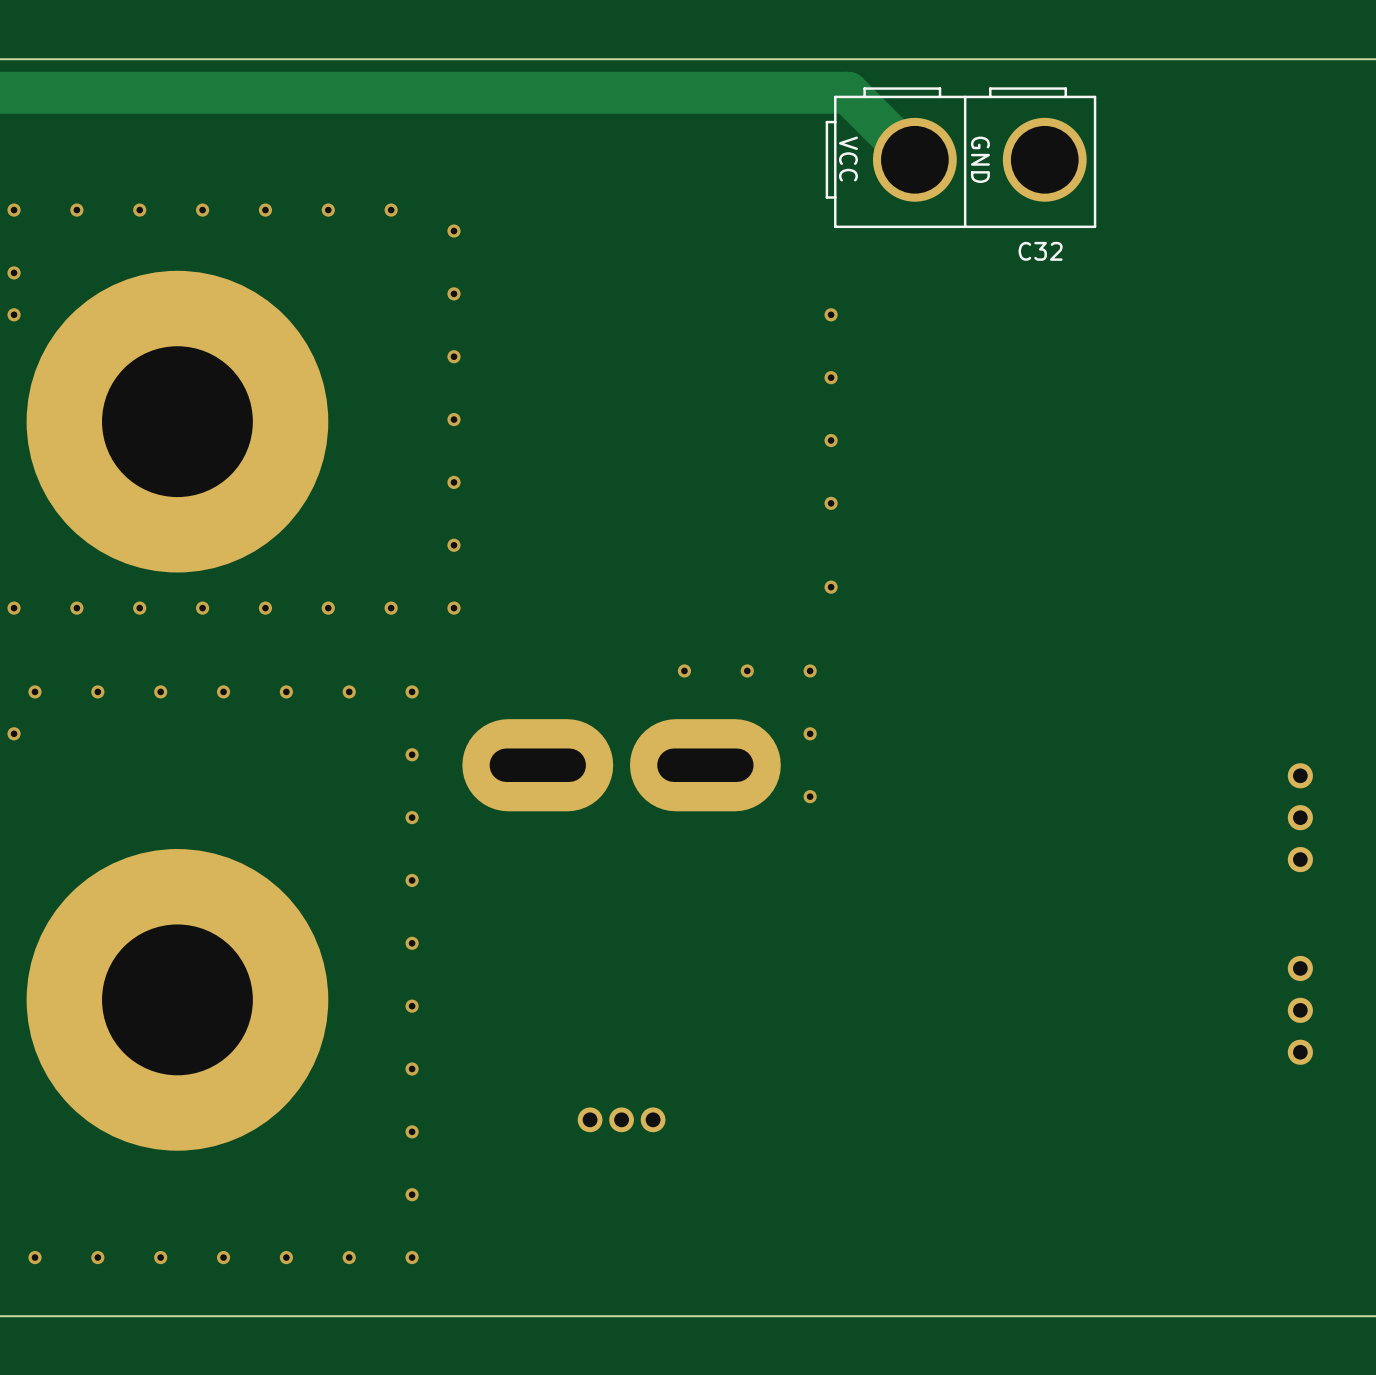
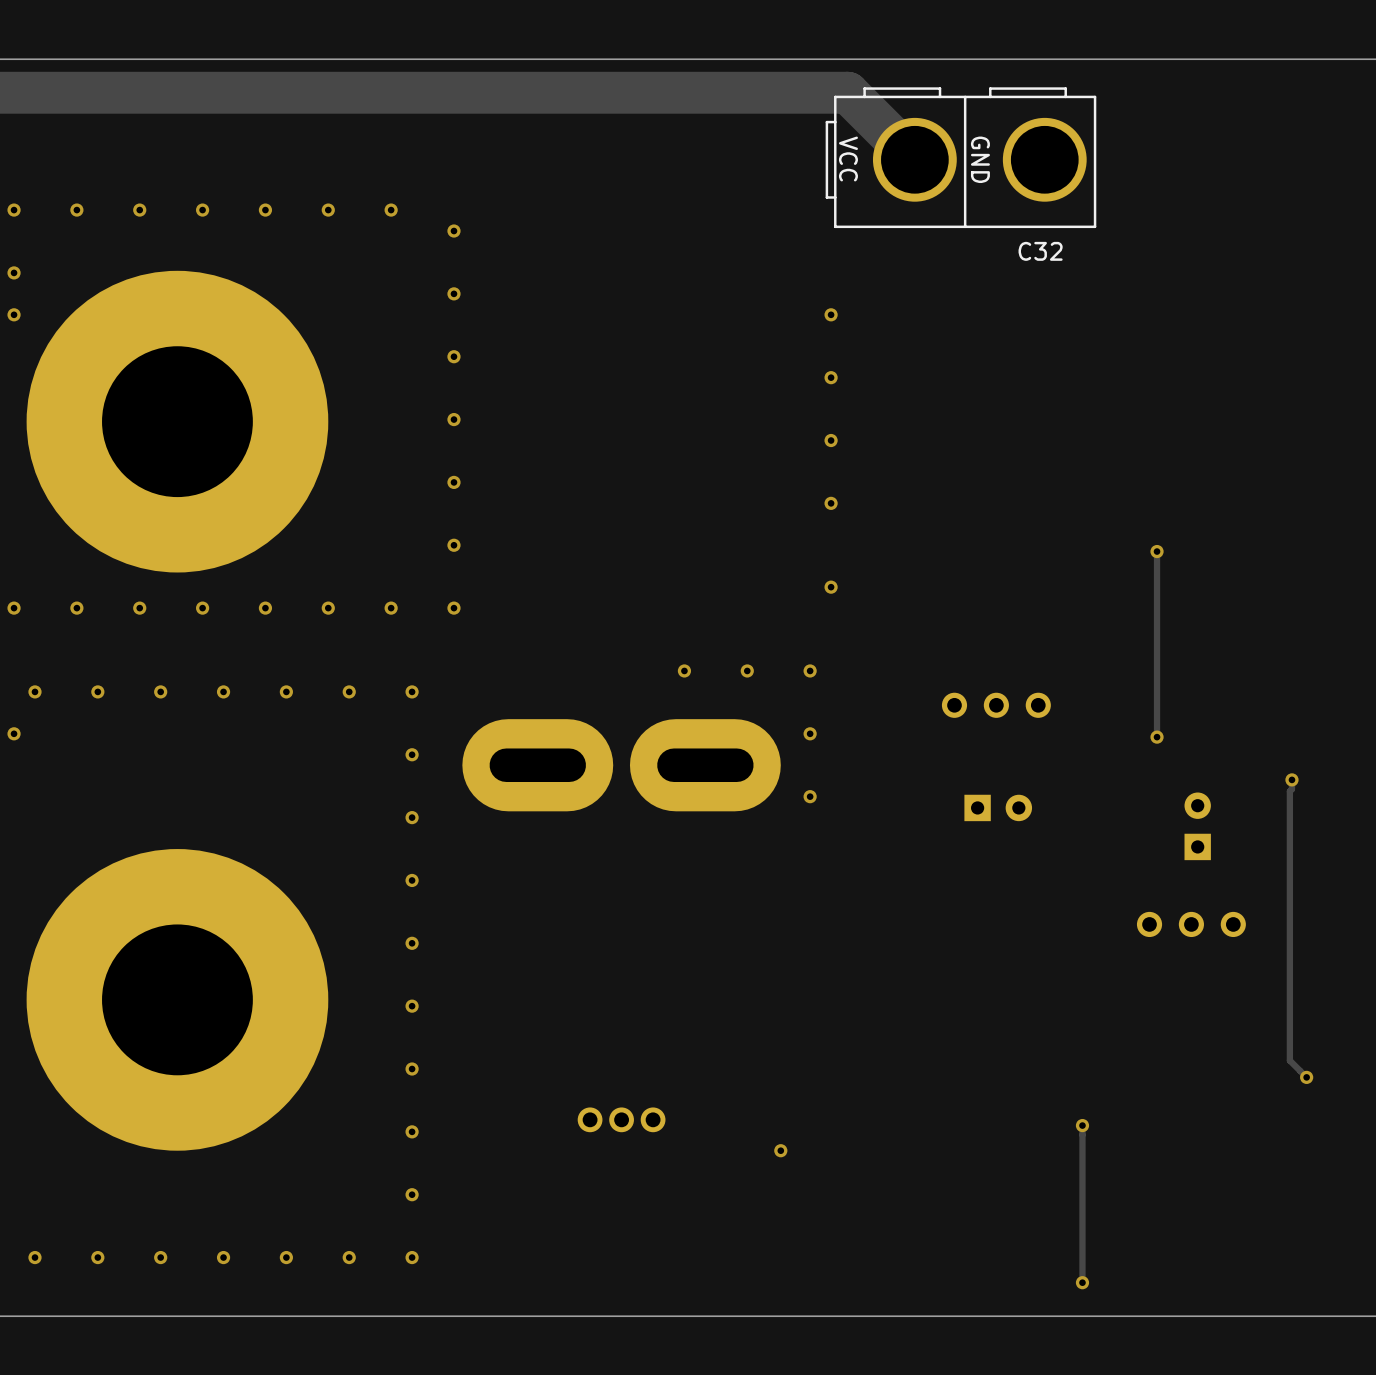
track: none -> (1157, 551) (1157, 737)
via: none -> (1157, 551)
part: none -> (996, 705)
via: none -> (1157, 737)
track: none -> (1291, 779) (1291, 789) (1289, 791) (1289, 1060) (1306, 1077)
via: none -> (1291, 779)
part: none -> (998, 807)
part: (1300, 817) -> none
part: none -> (1197, 826)
part: none -> (1191, 924)
part: (1300, 1010) -> none
via: none -> (1306, 1077)
track: none -> (1082, 1125) (1082, 1282)
via: none -> (1082, 1125)
via: none -> (780, 1150)
via: none -> (1082, 1282)

